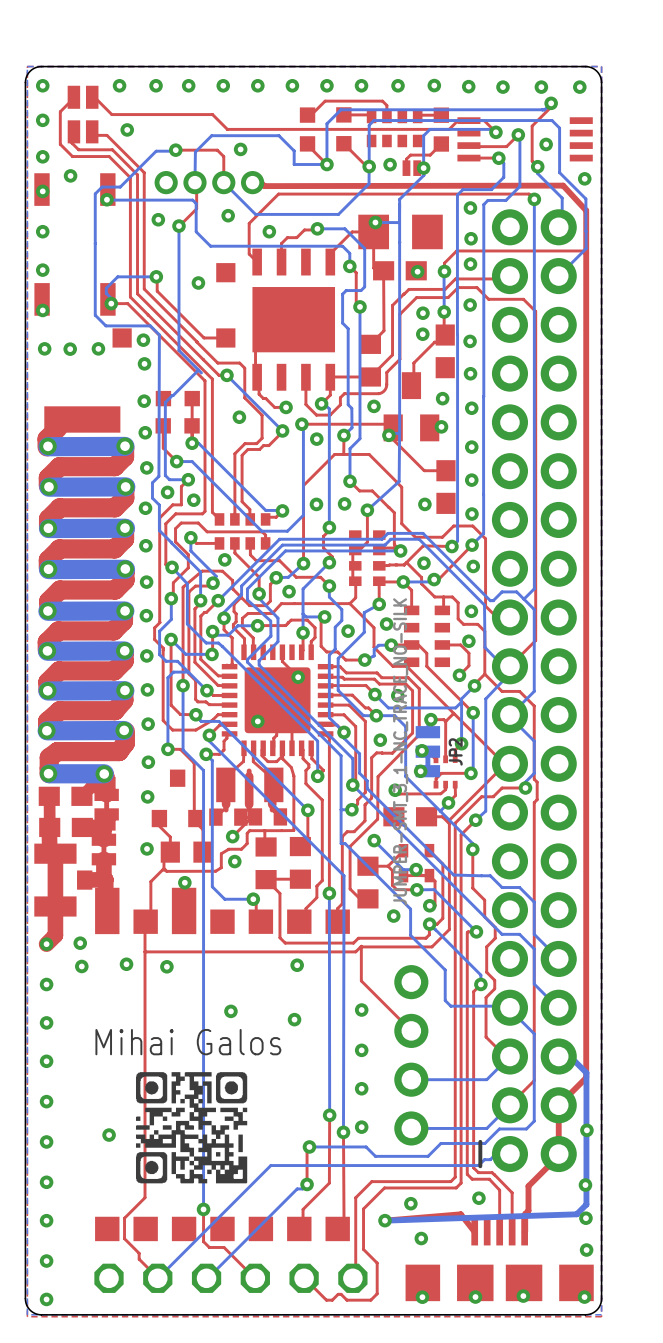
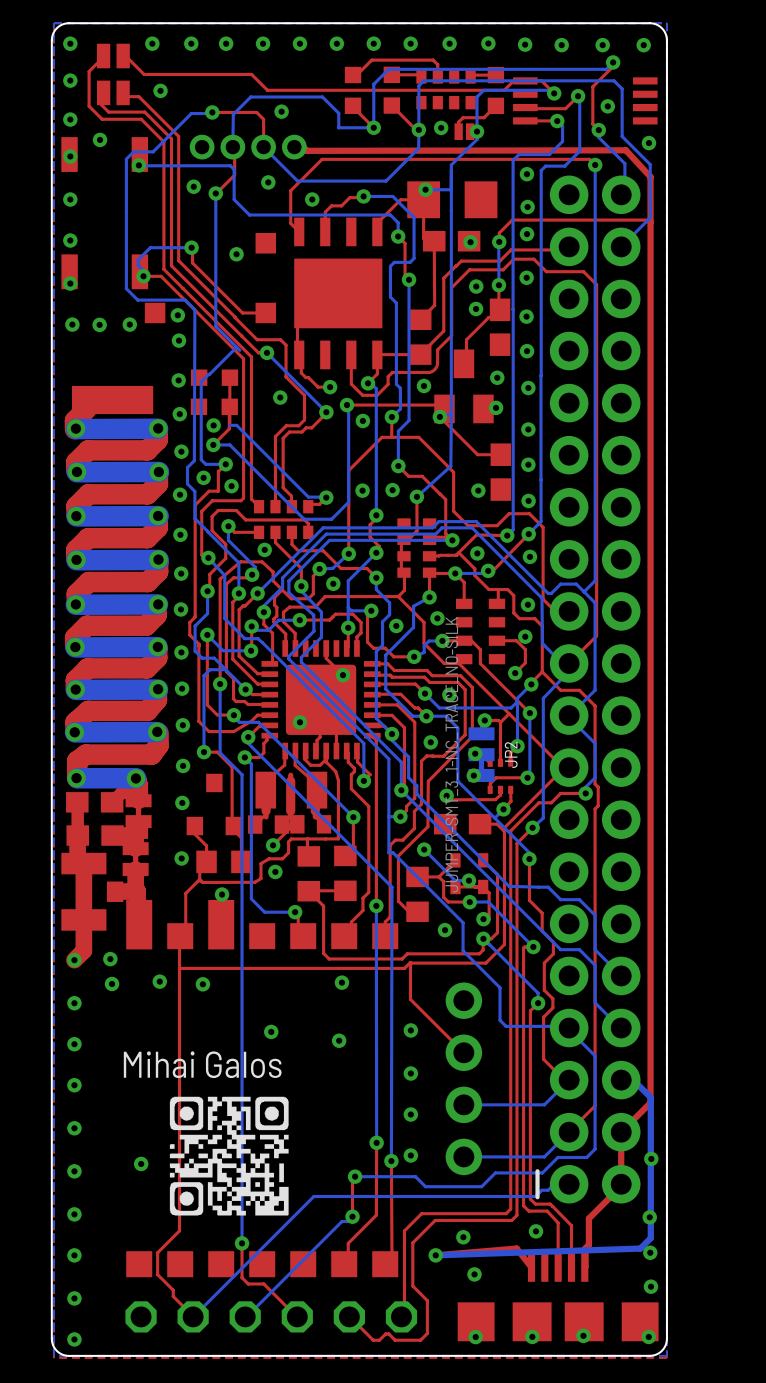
top track: (163, 425) (163, 448) (176, 461) -> (229, 406) (229, 428) (213, 444)
via position: (192, 443) -> (213, 425)

